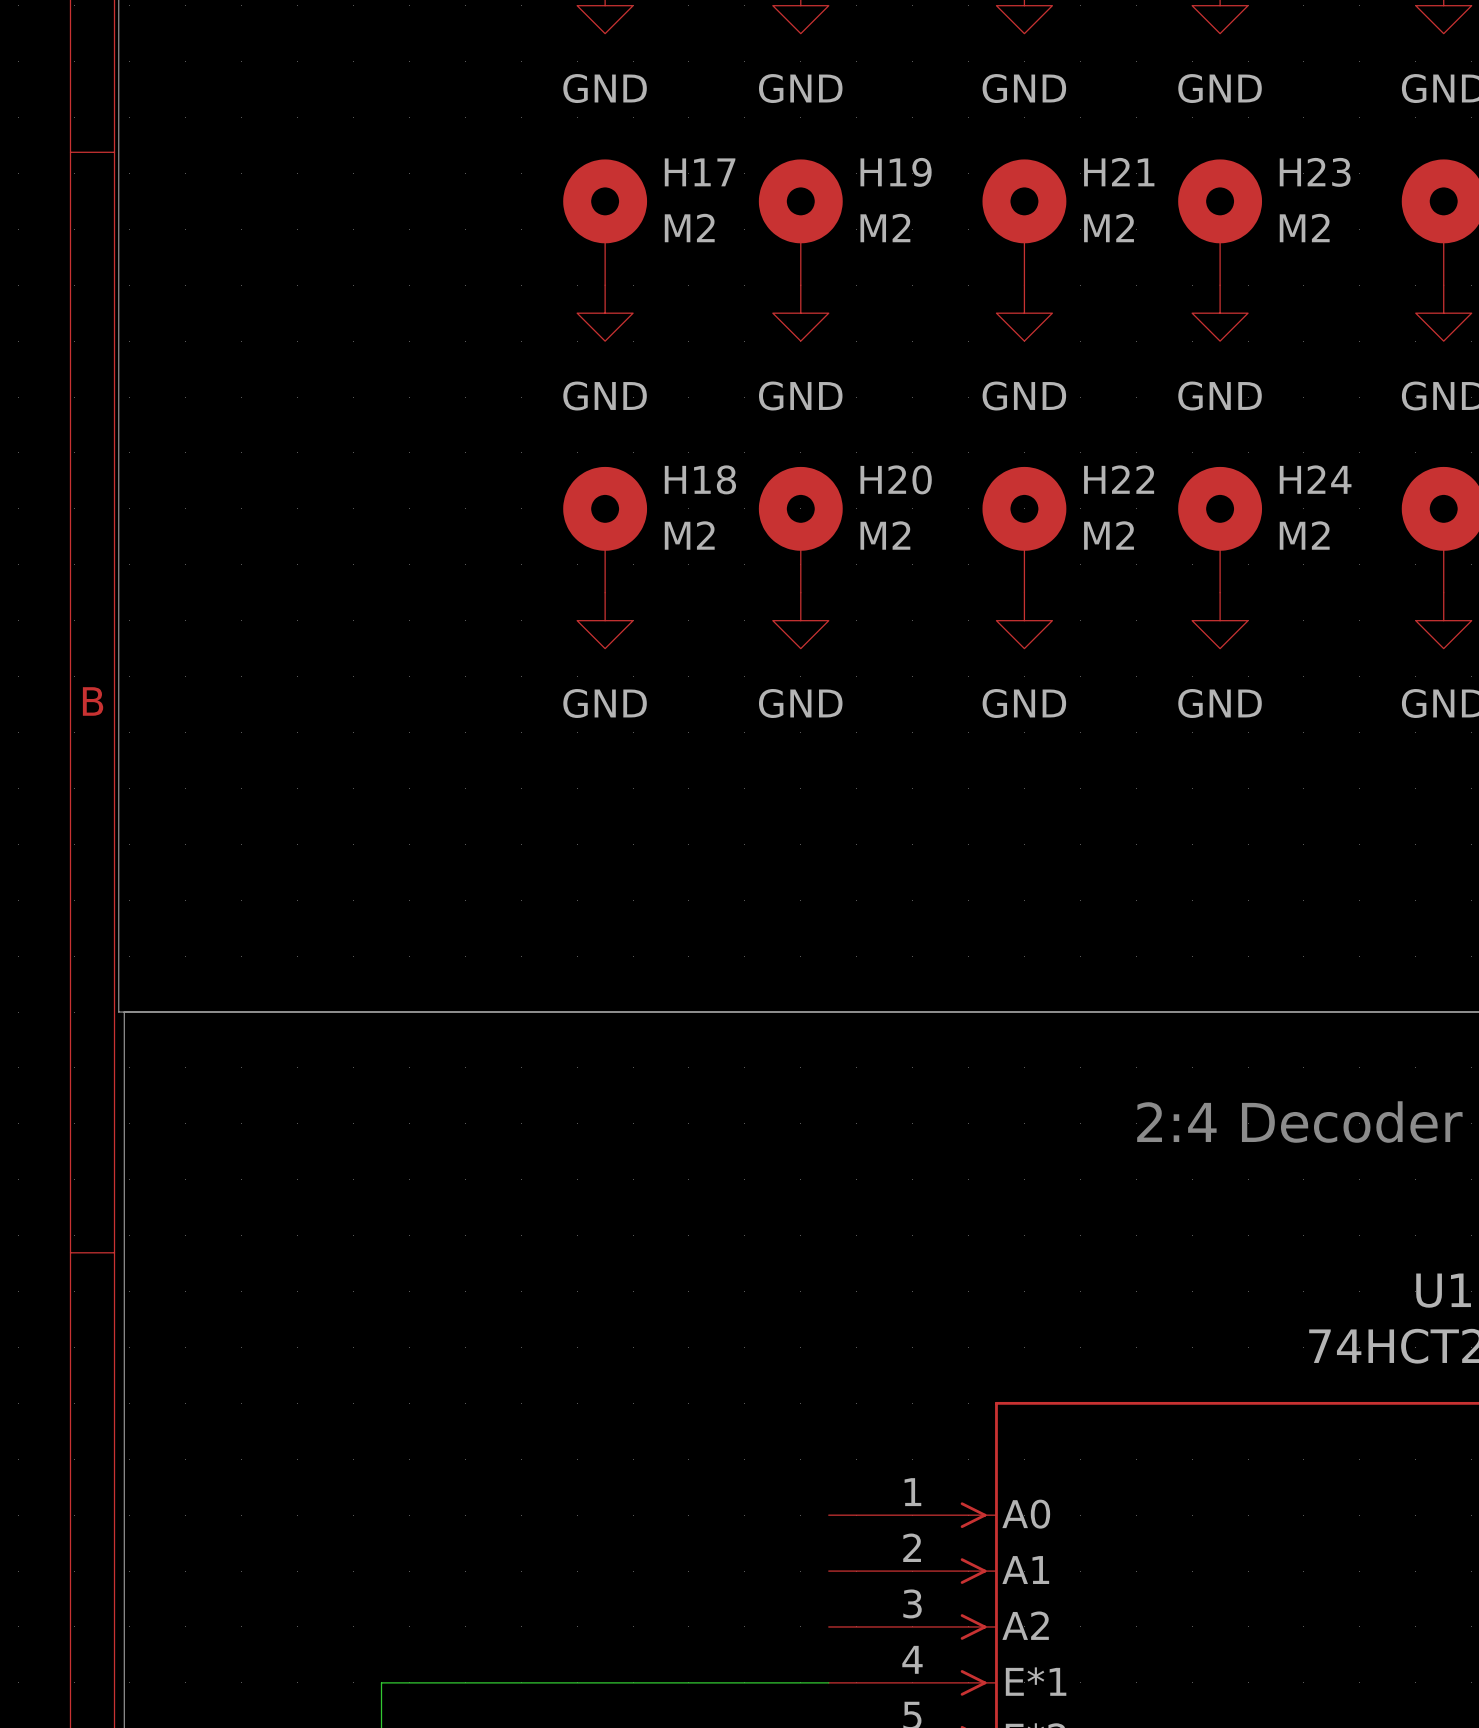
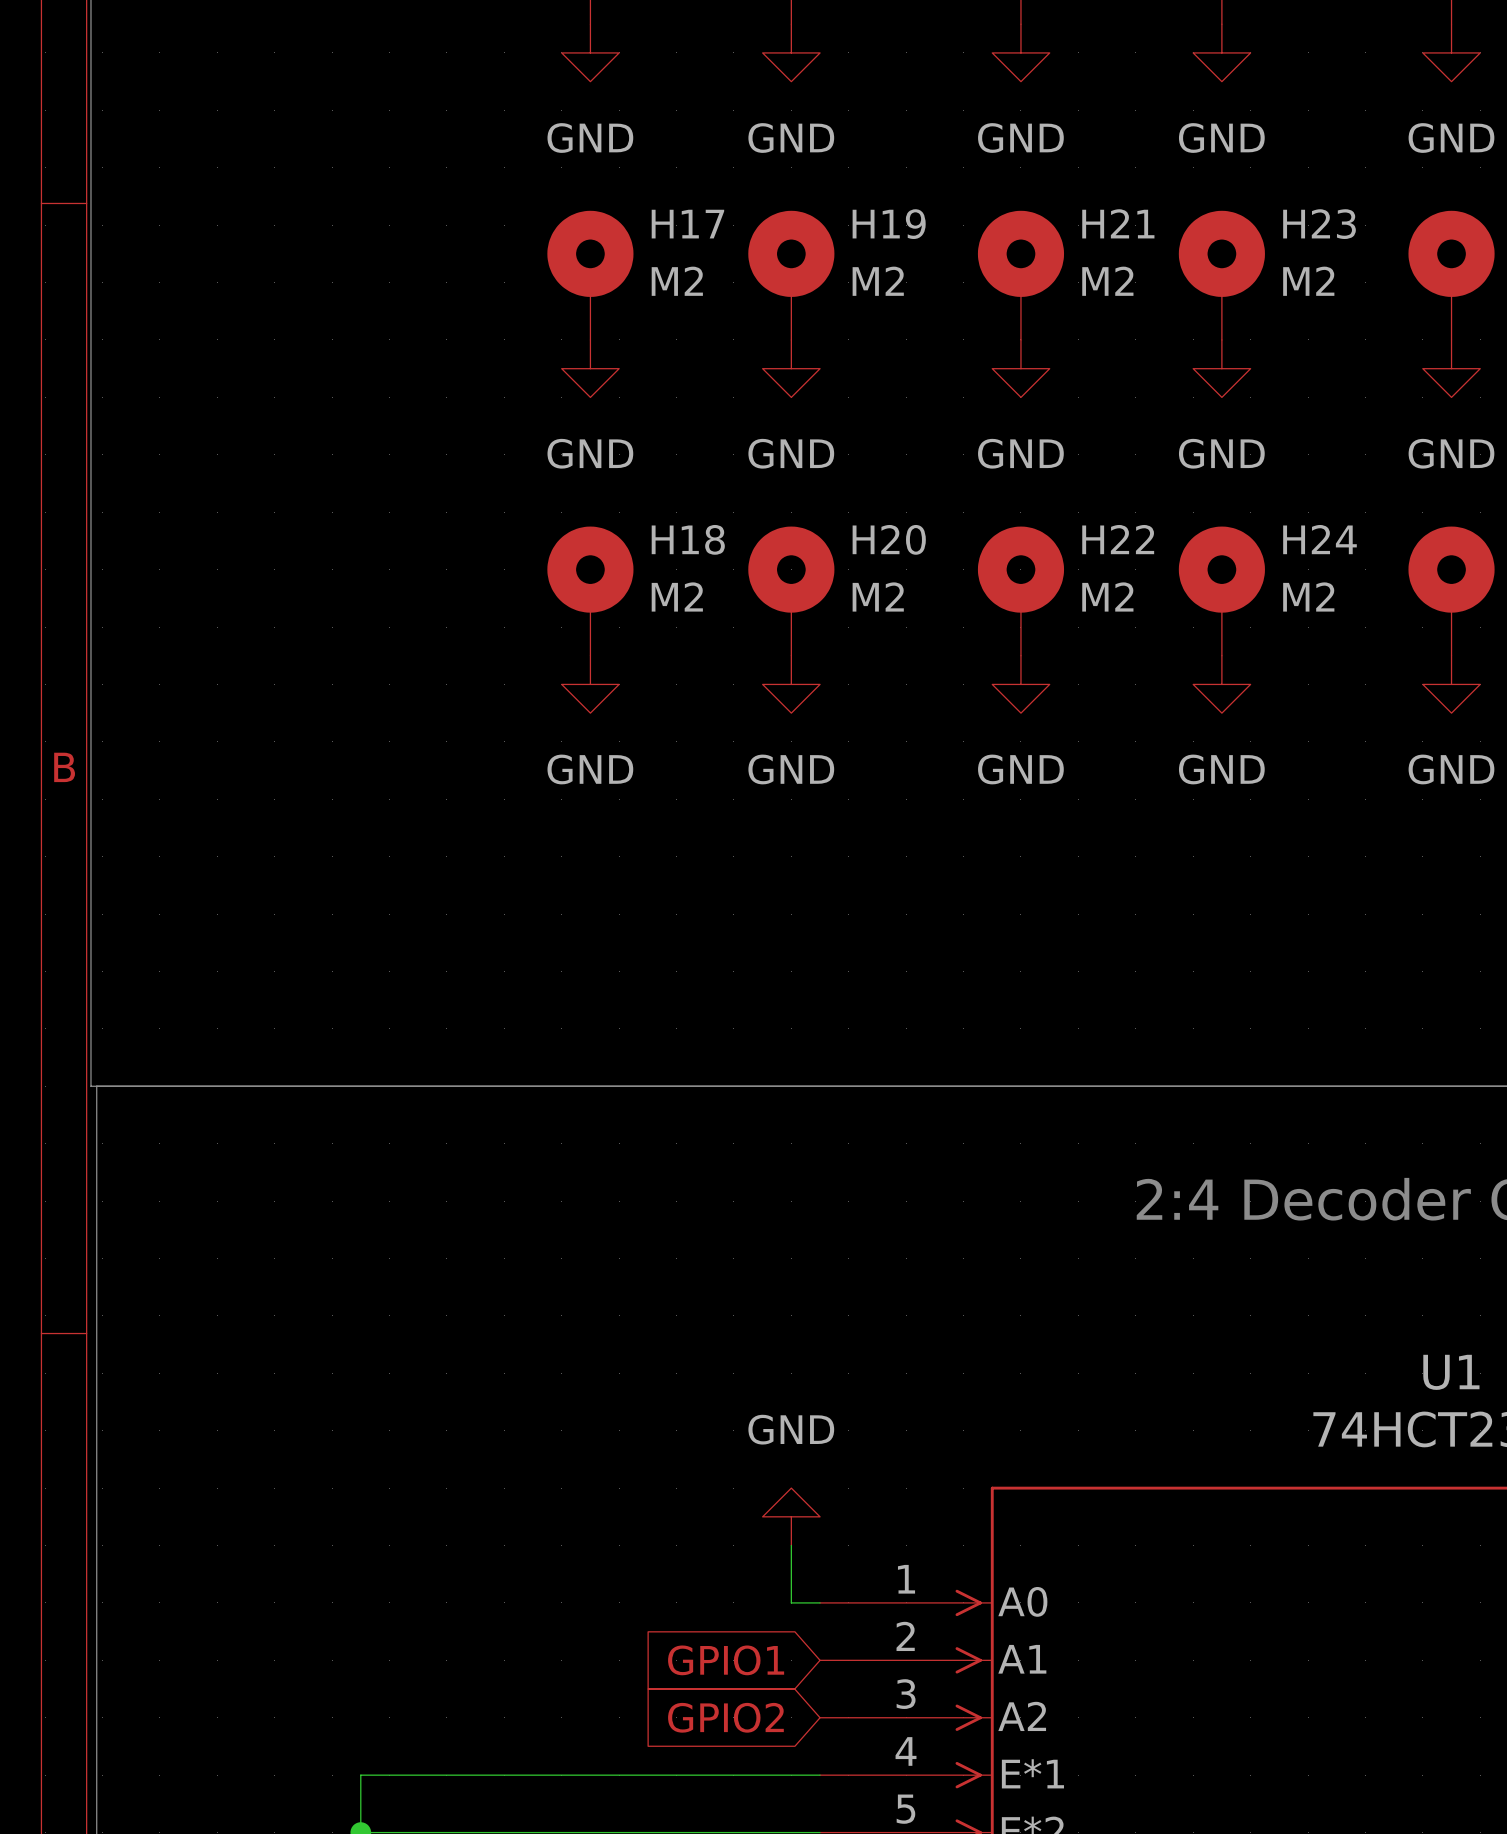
power symbol: none -> GND (791, 1516)
wire: none -> (791, 1545) (791, 1602) (820, 1602)
global label: none -> GPIO1 (726, 1660)
global label: none -> GPIO2 (725, 1717)

